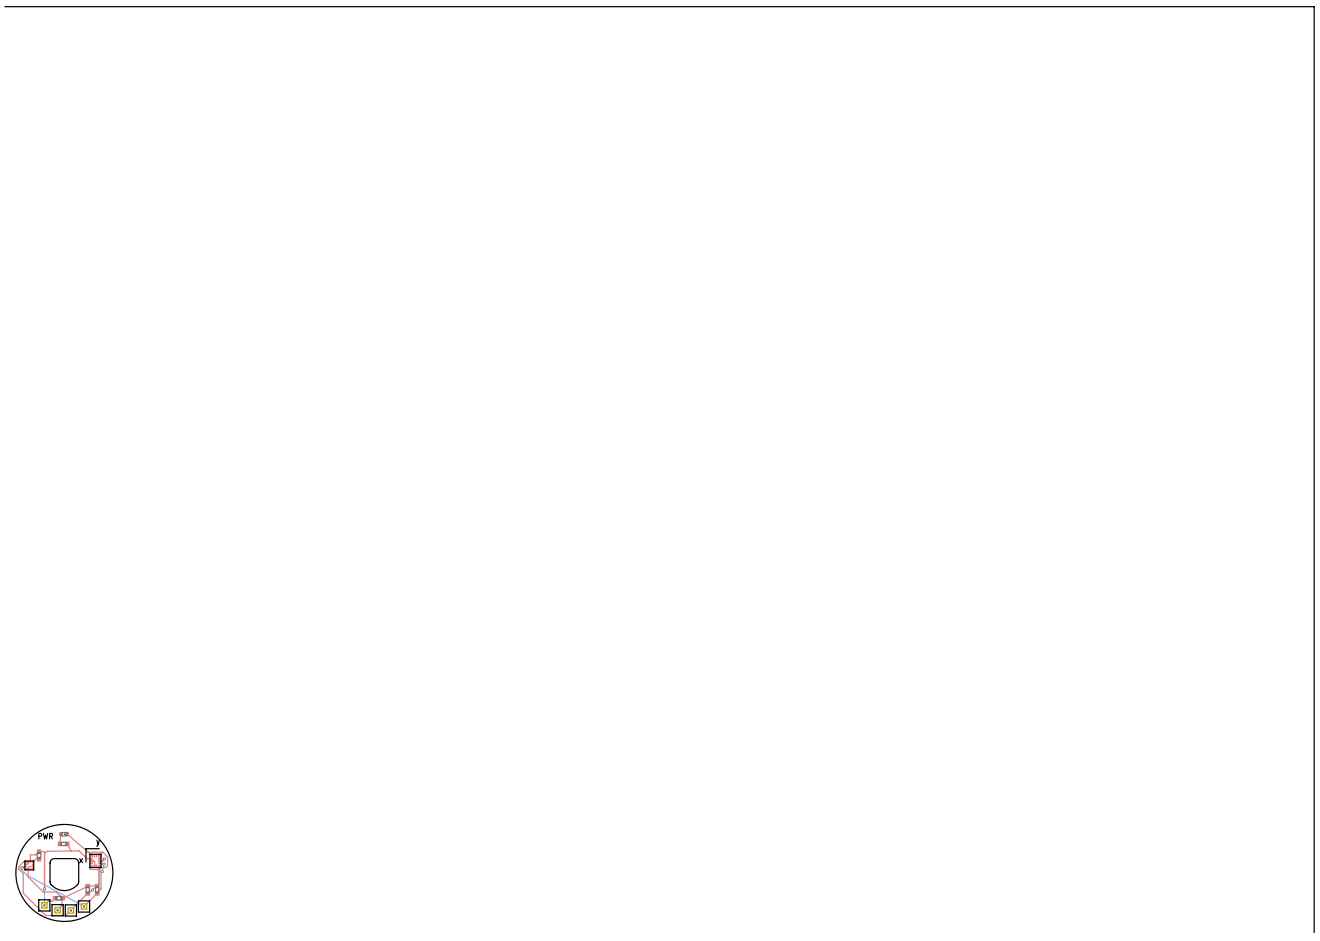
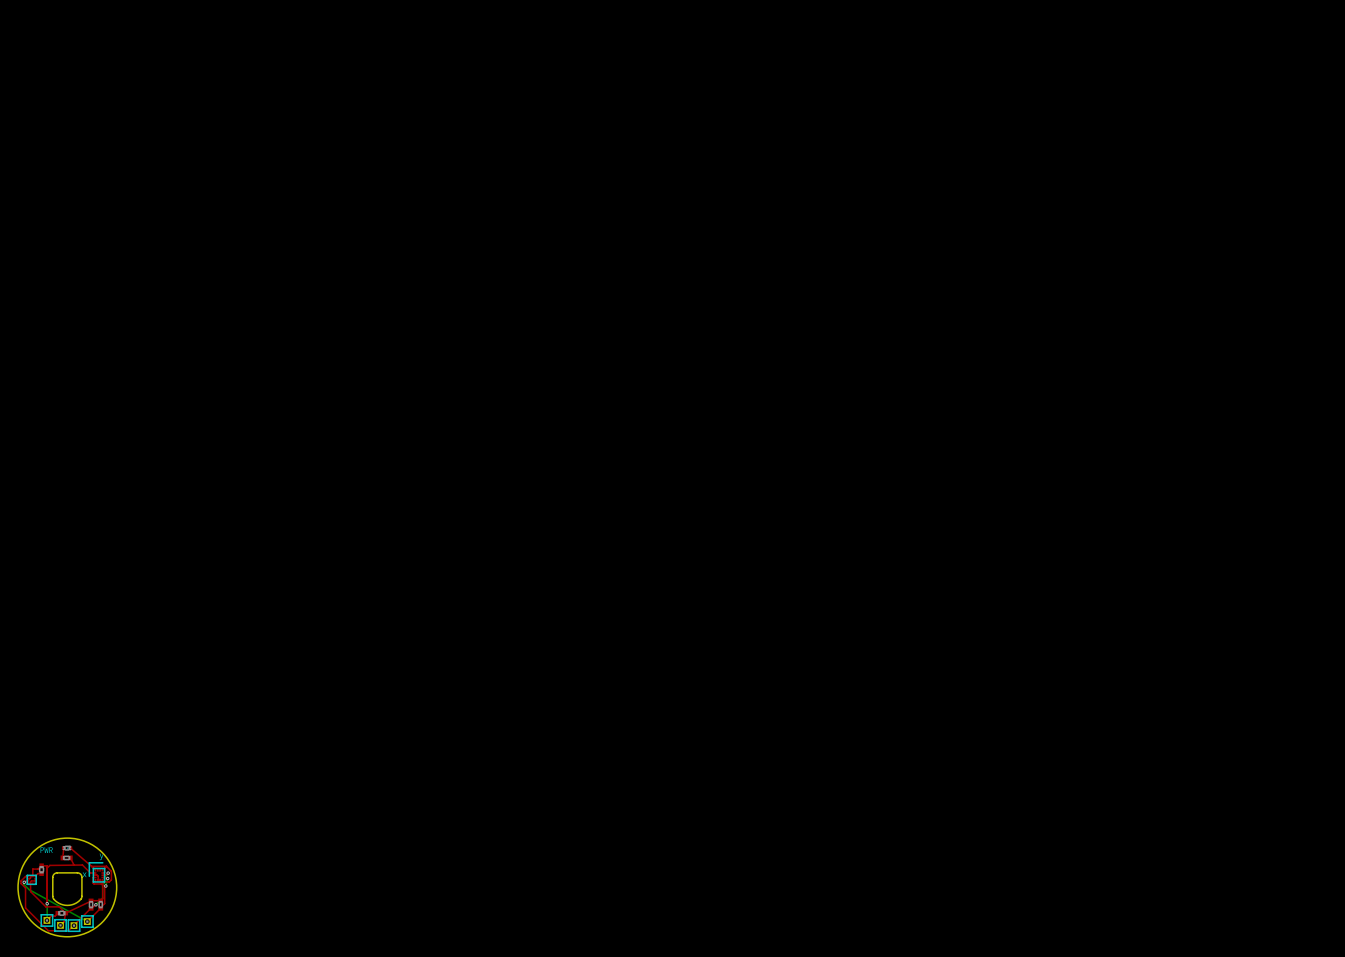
board edge: (4, 6) (1314, 6) (1314, 932) -> none

